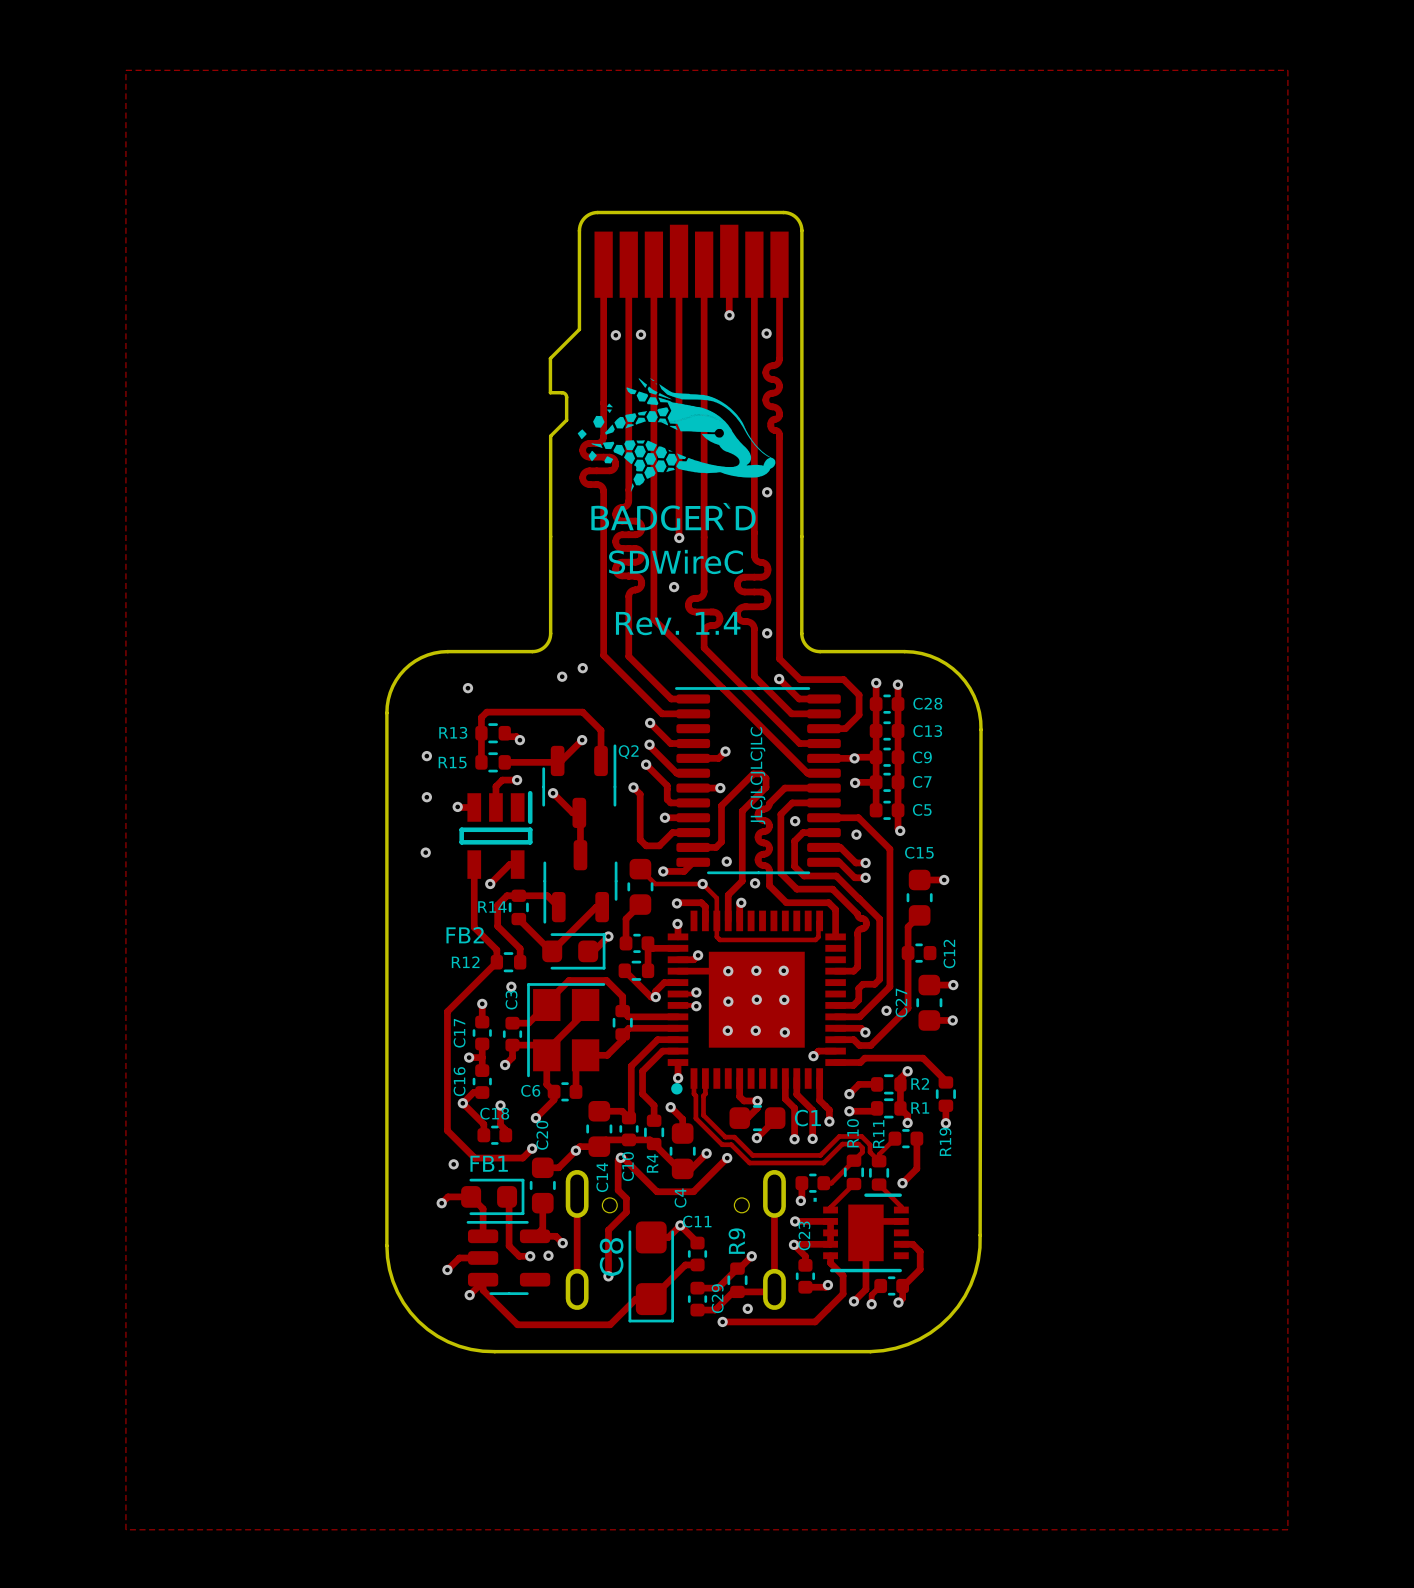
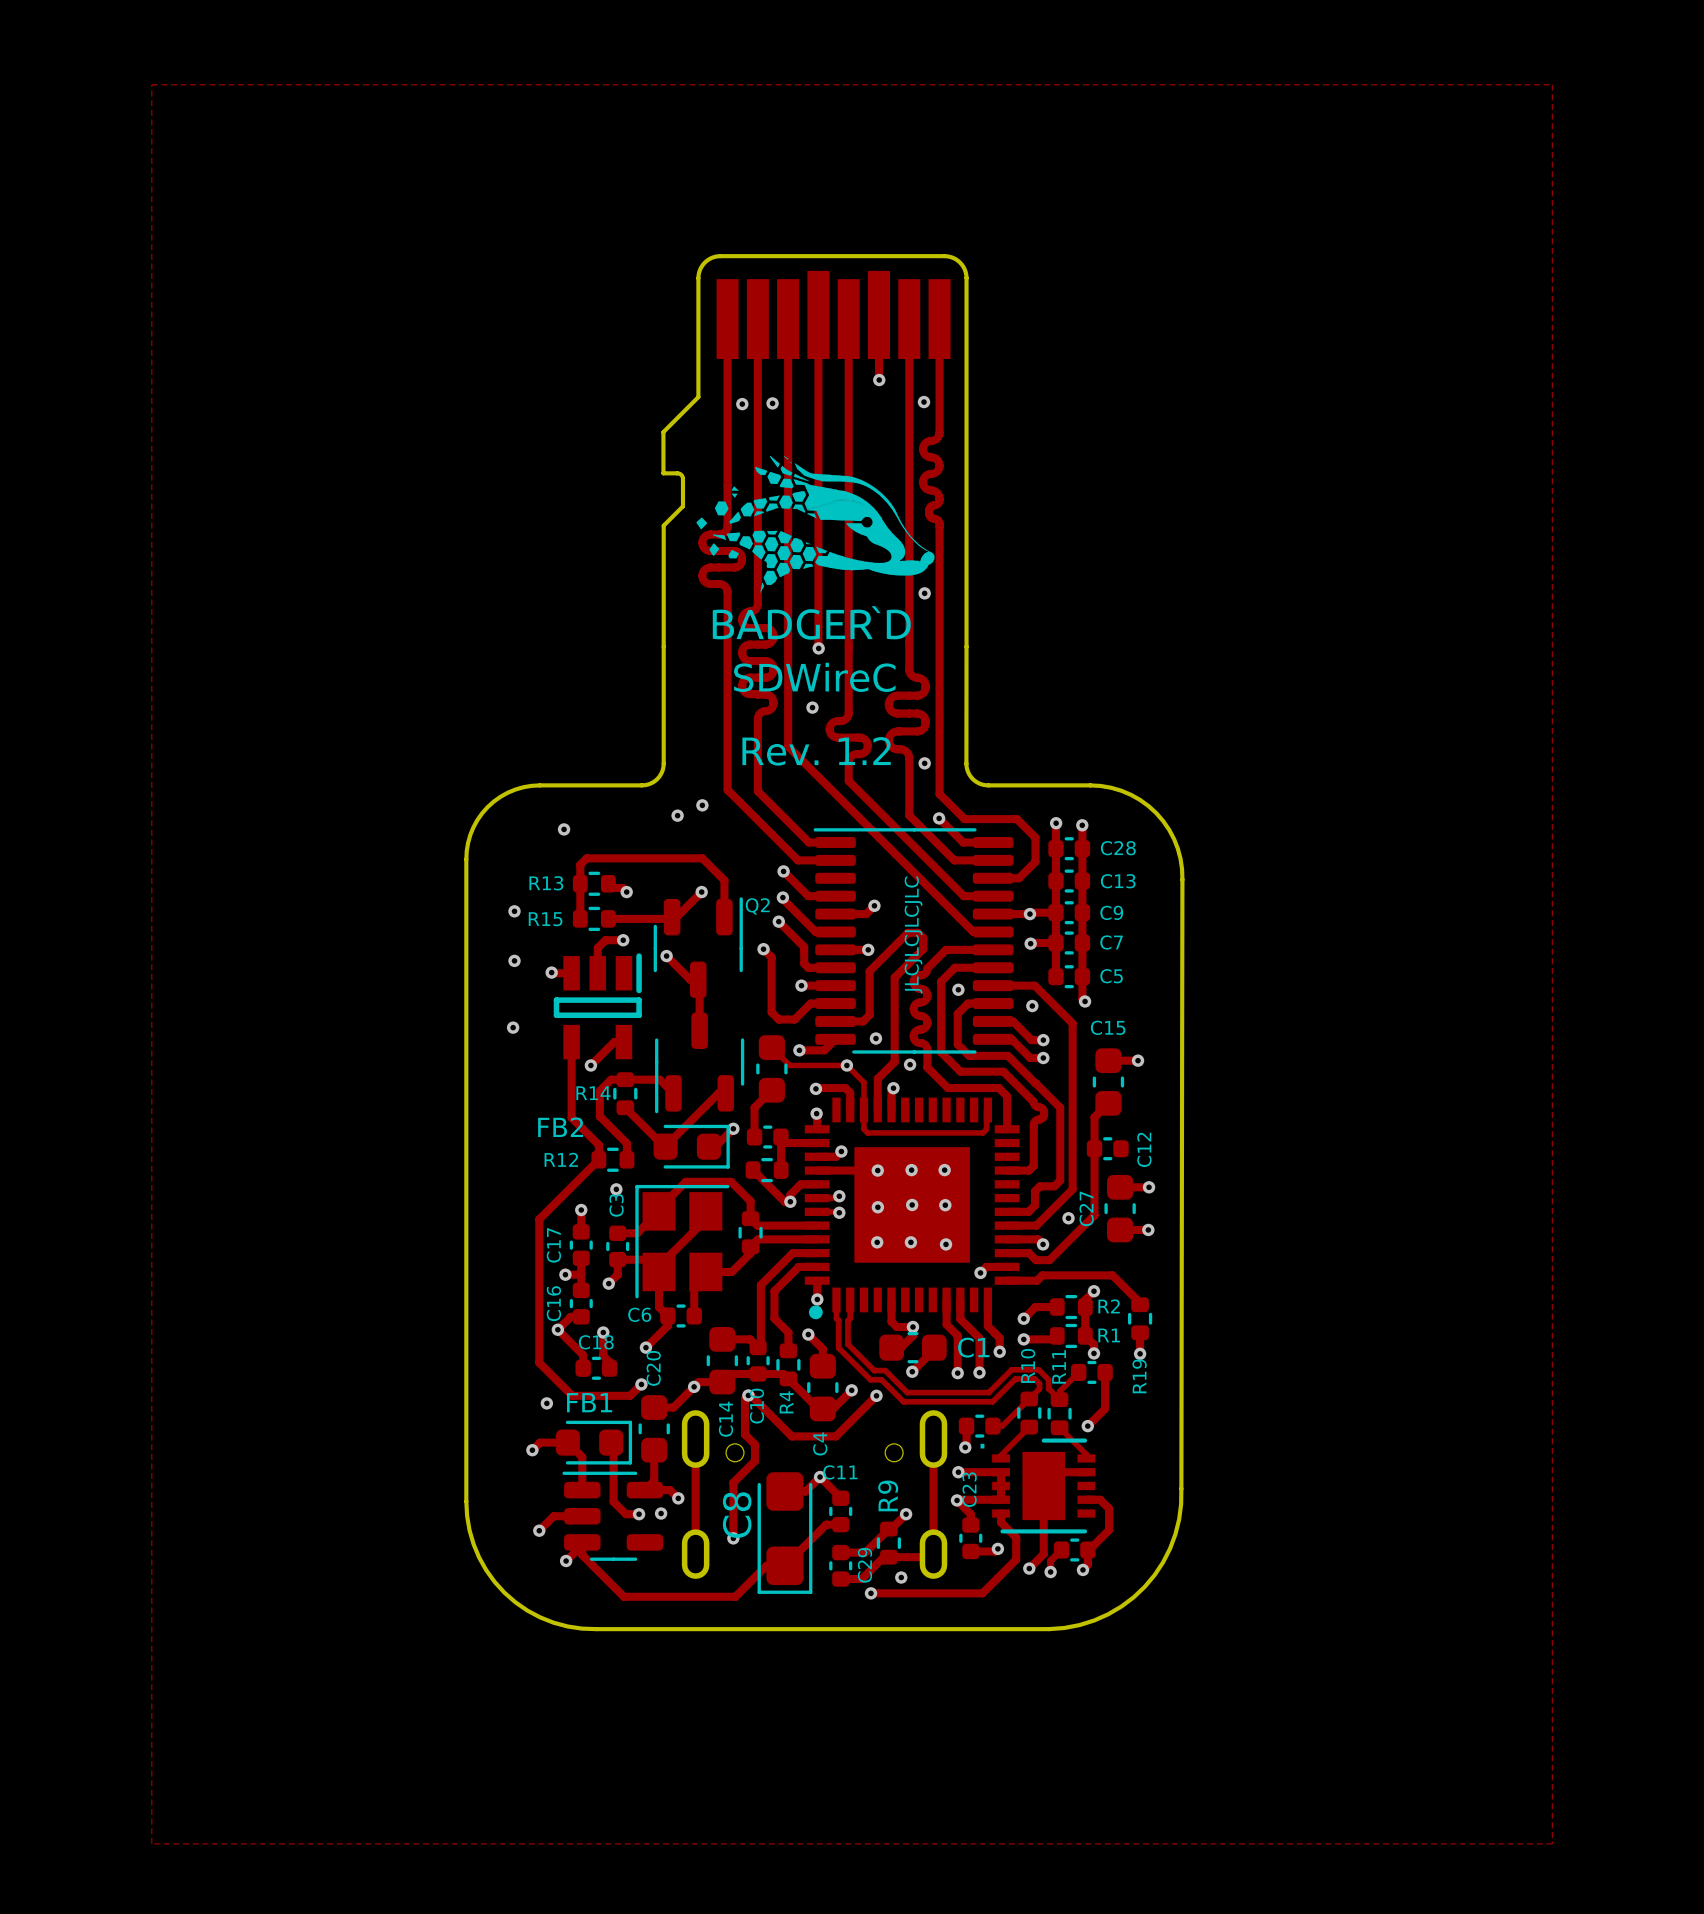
text: Rev. 1.4 (678, 623) -> Rev. 1.2 (816, 751)

